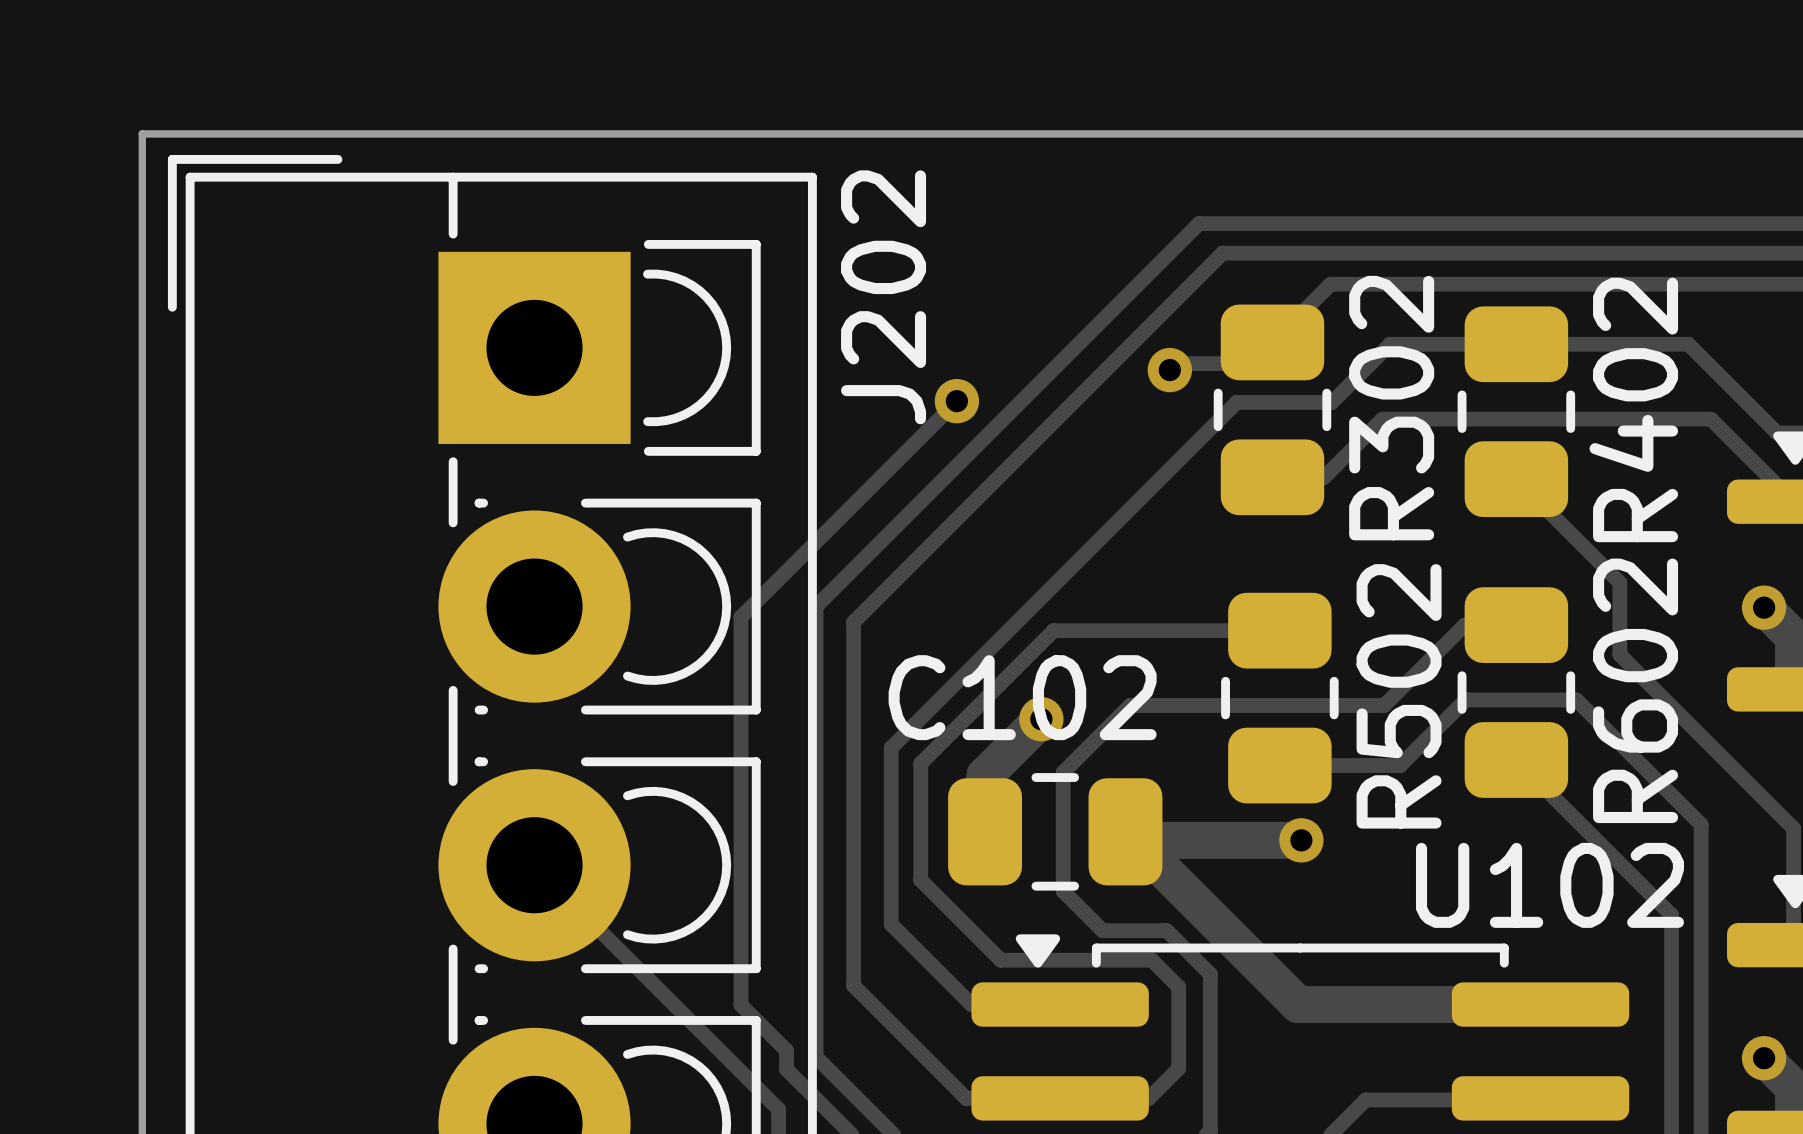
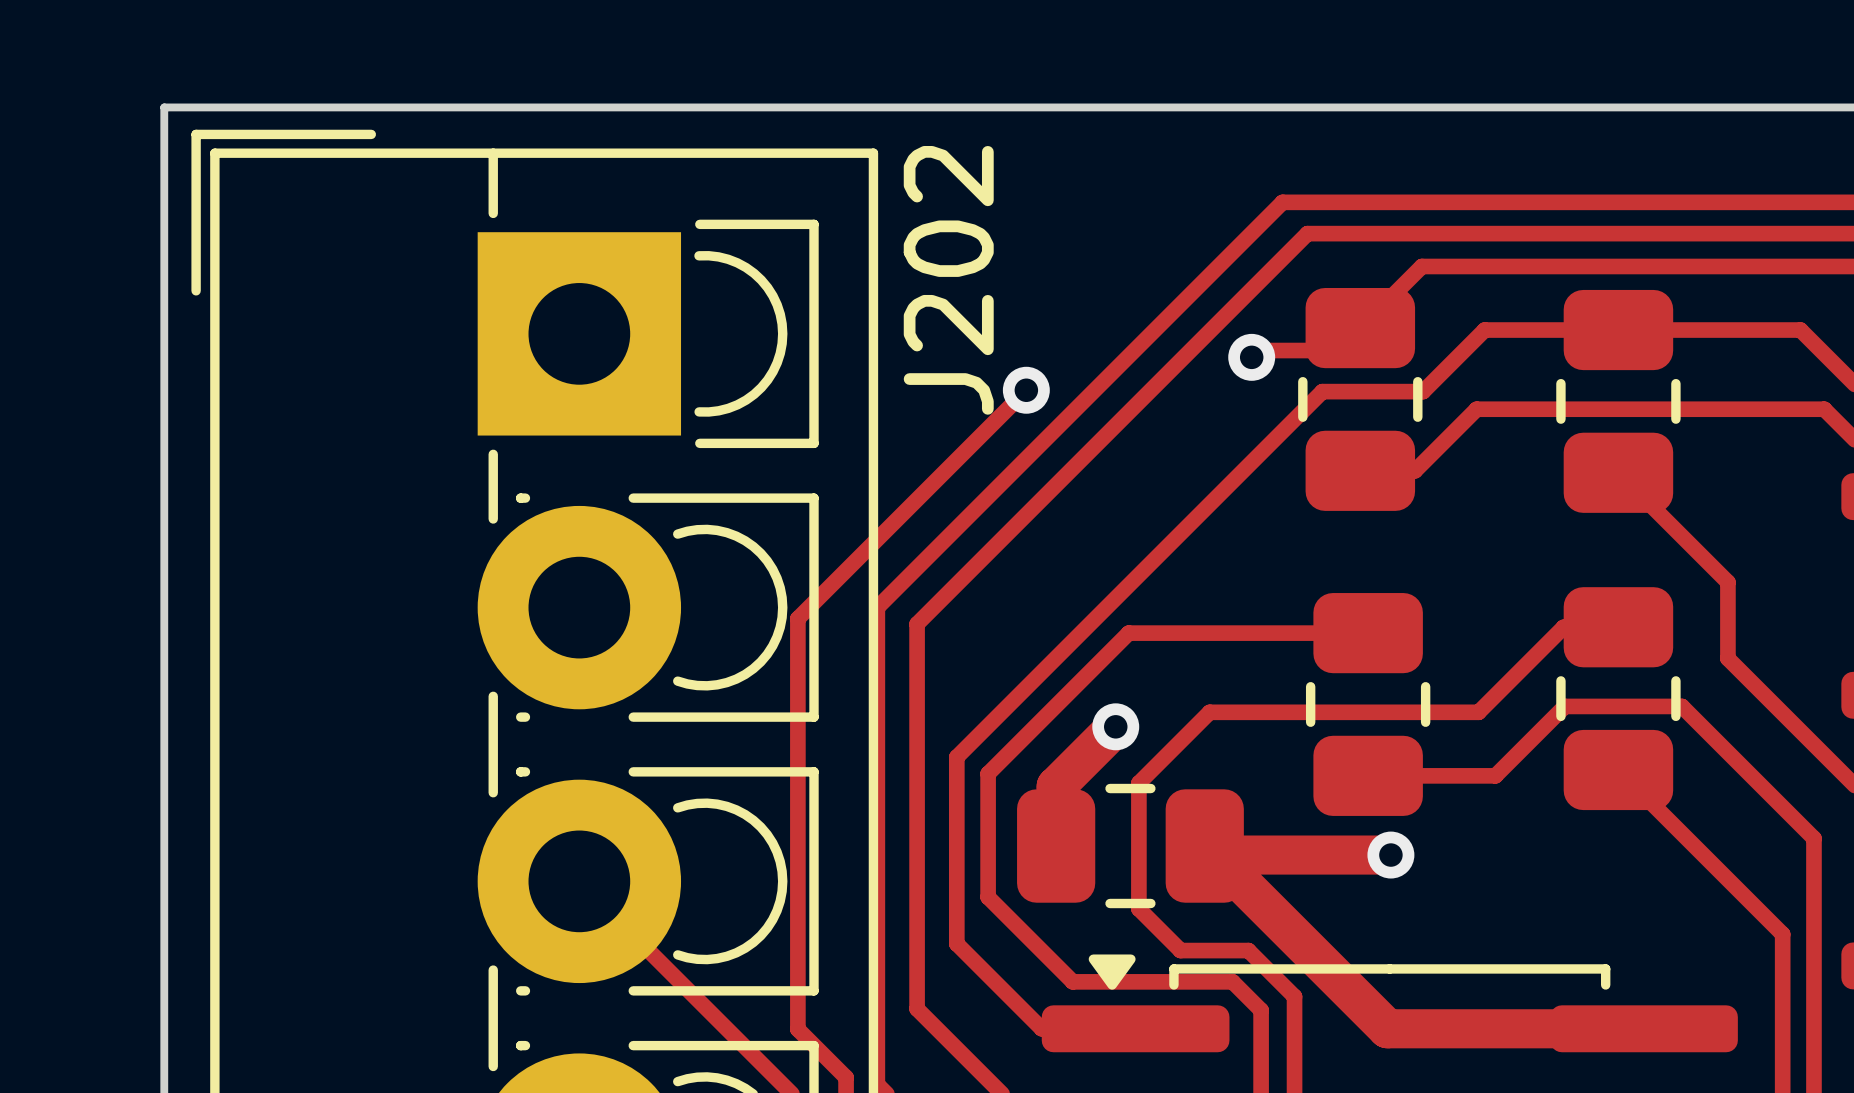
R302 name: R302 (1391, 408) -> none
R402 name: R402 (1633, 409) -> none
R602 name: R602 (1635, 690) -> none
R502 name: R502 (1399, 696) -> none
C102 name: C102 (1022, 697) -> none
U102 name: U102 (1549, 885) -> none

